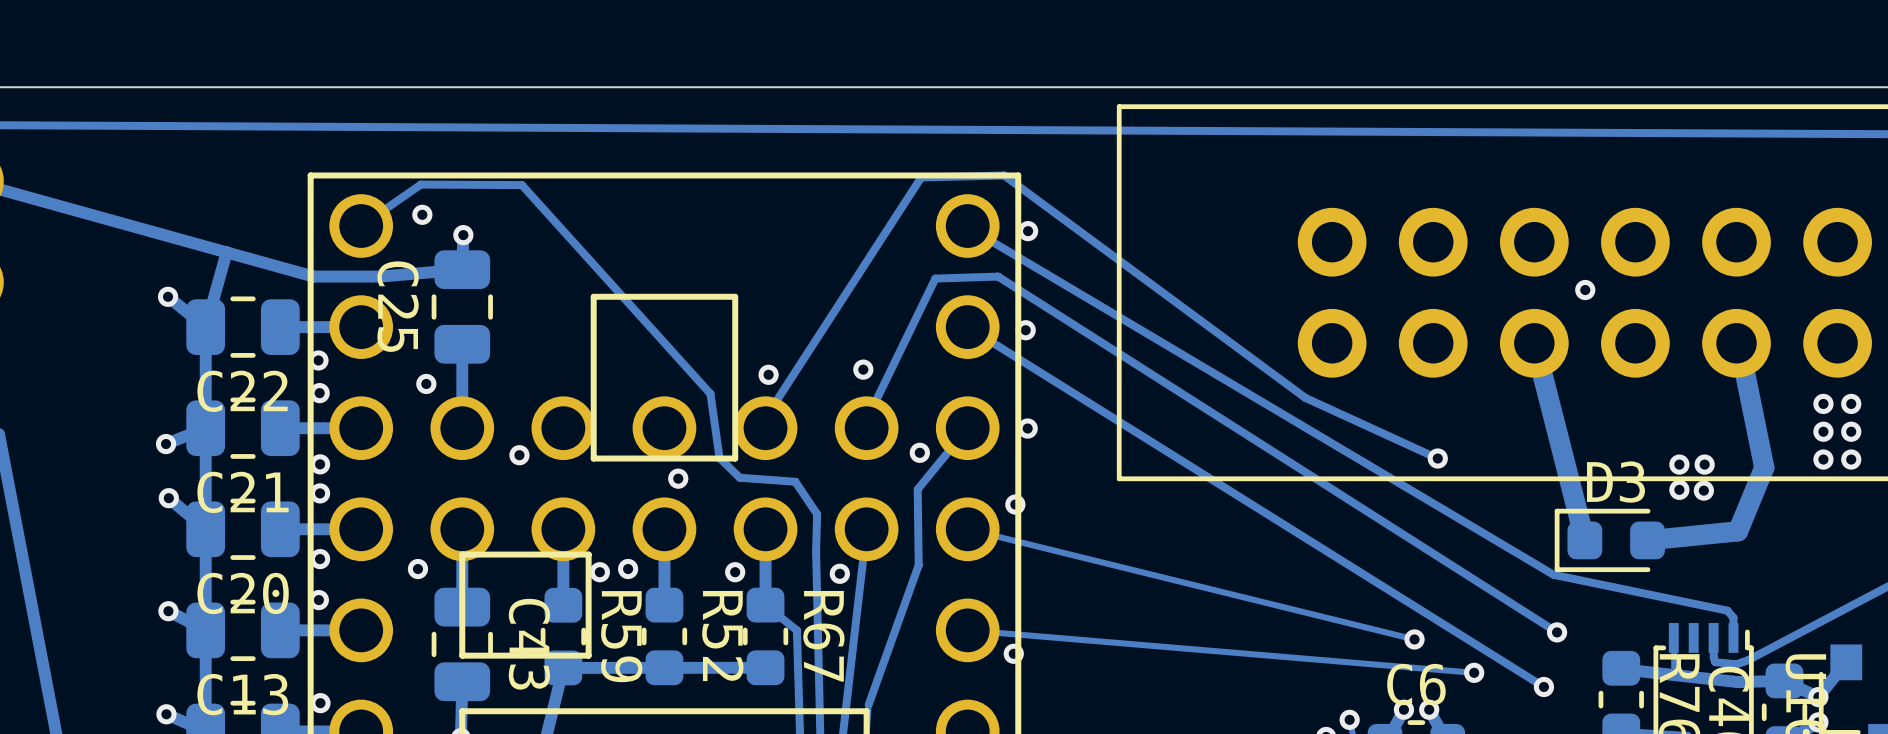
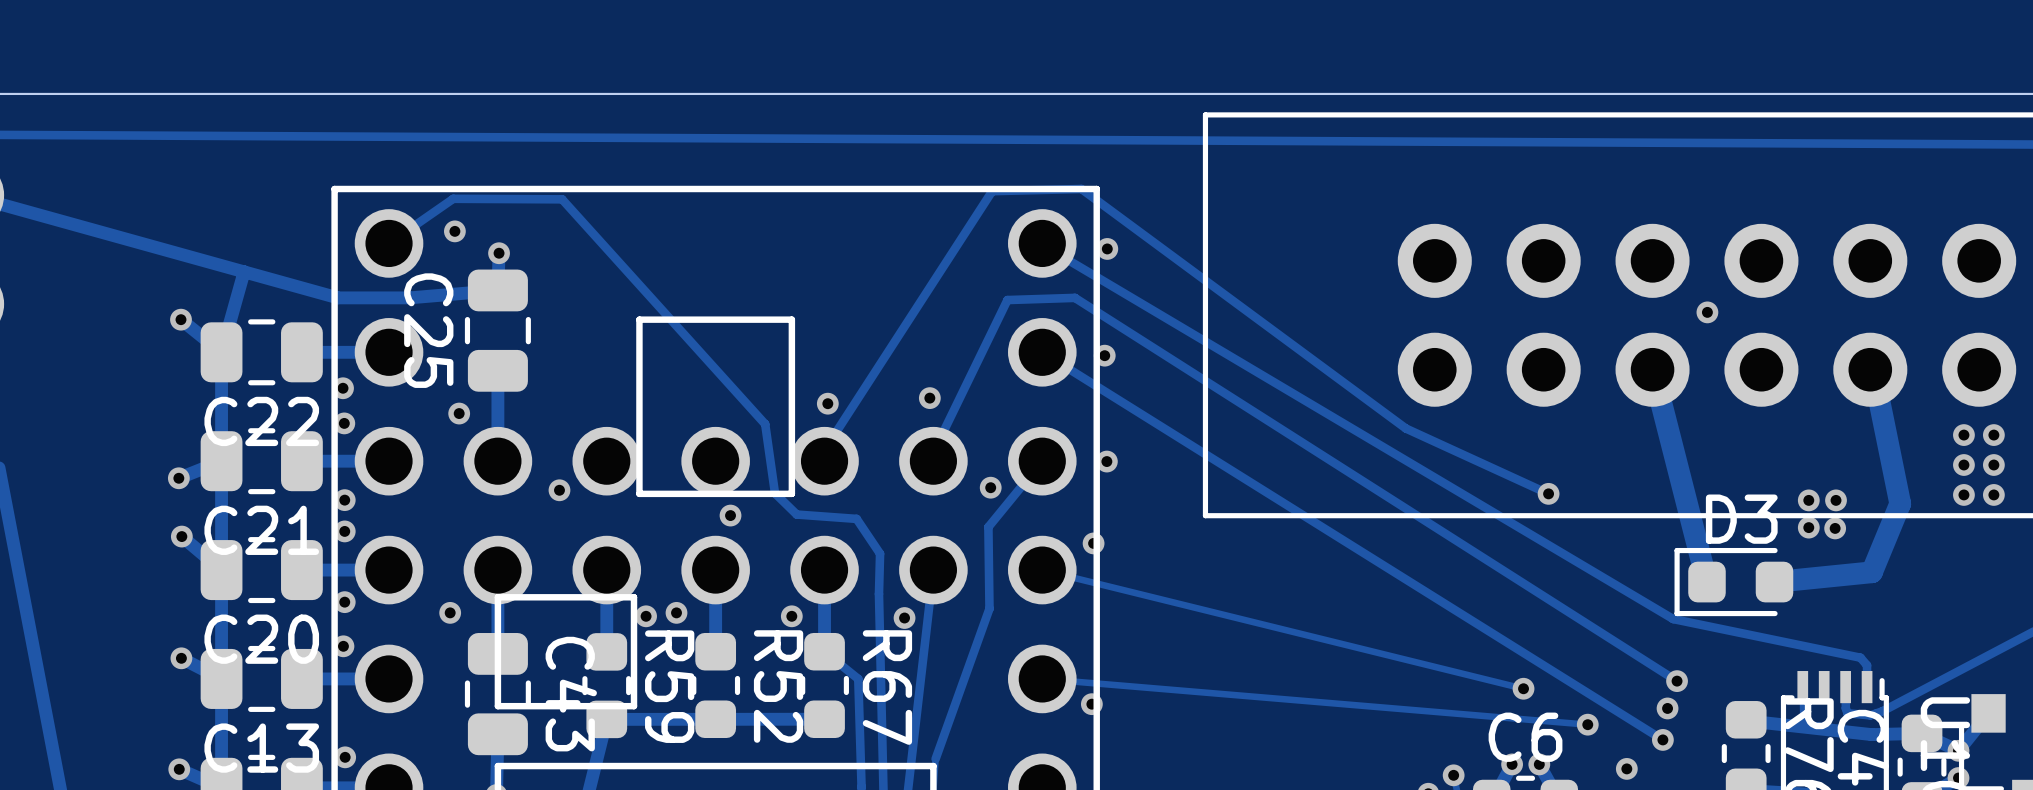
via: none -> (1667, 708)
via: none -> (1626, 768)

